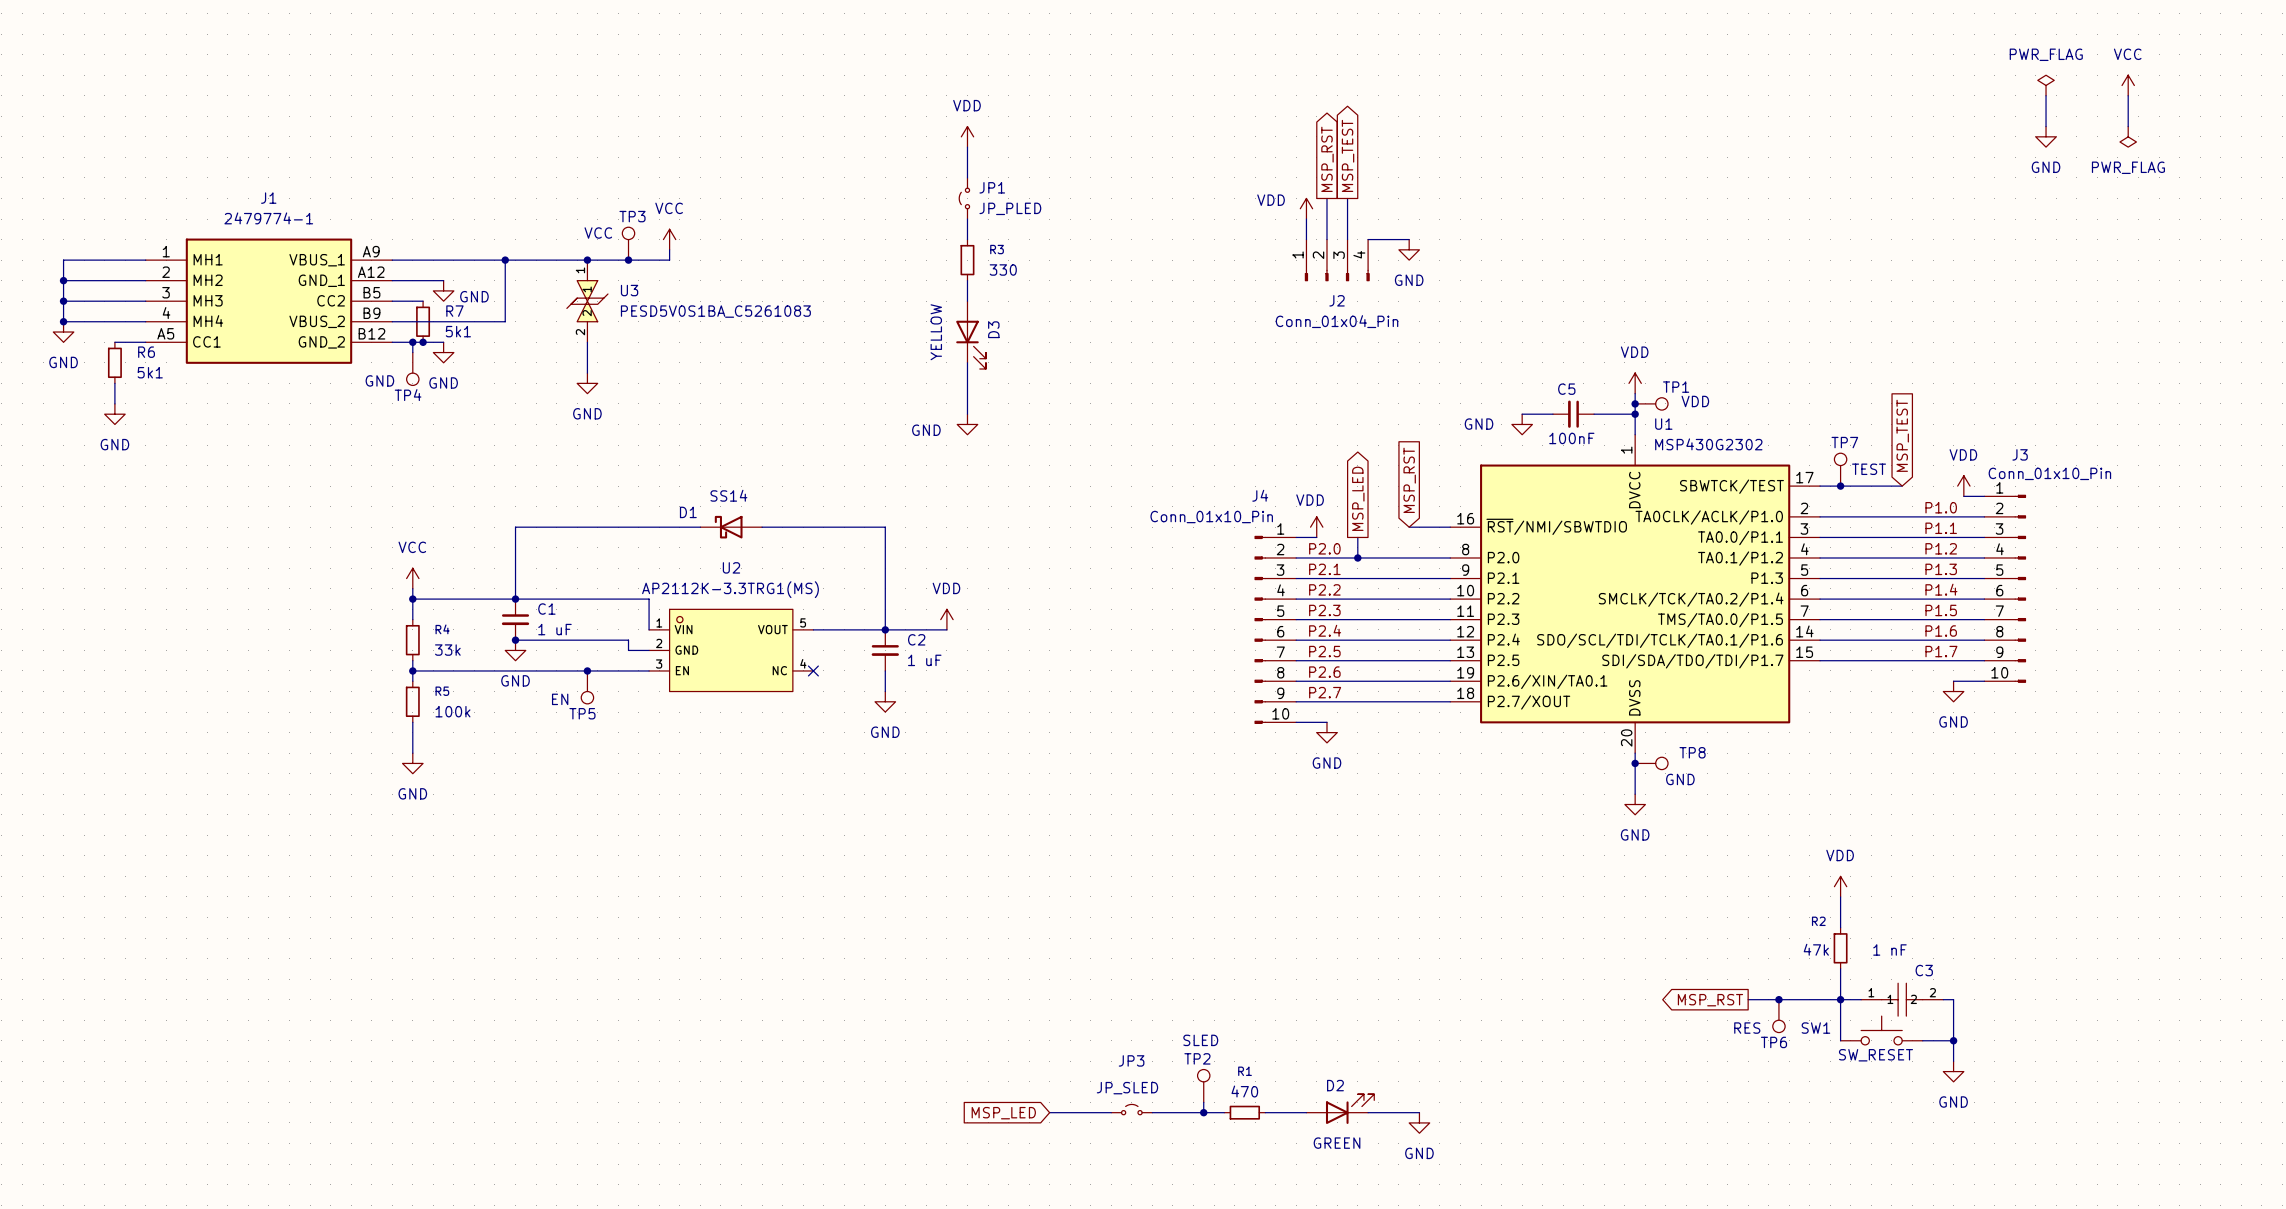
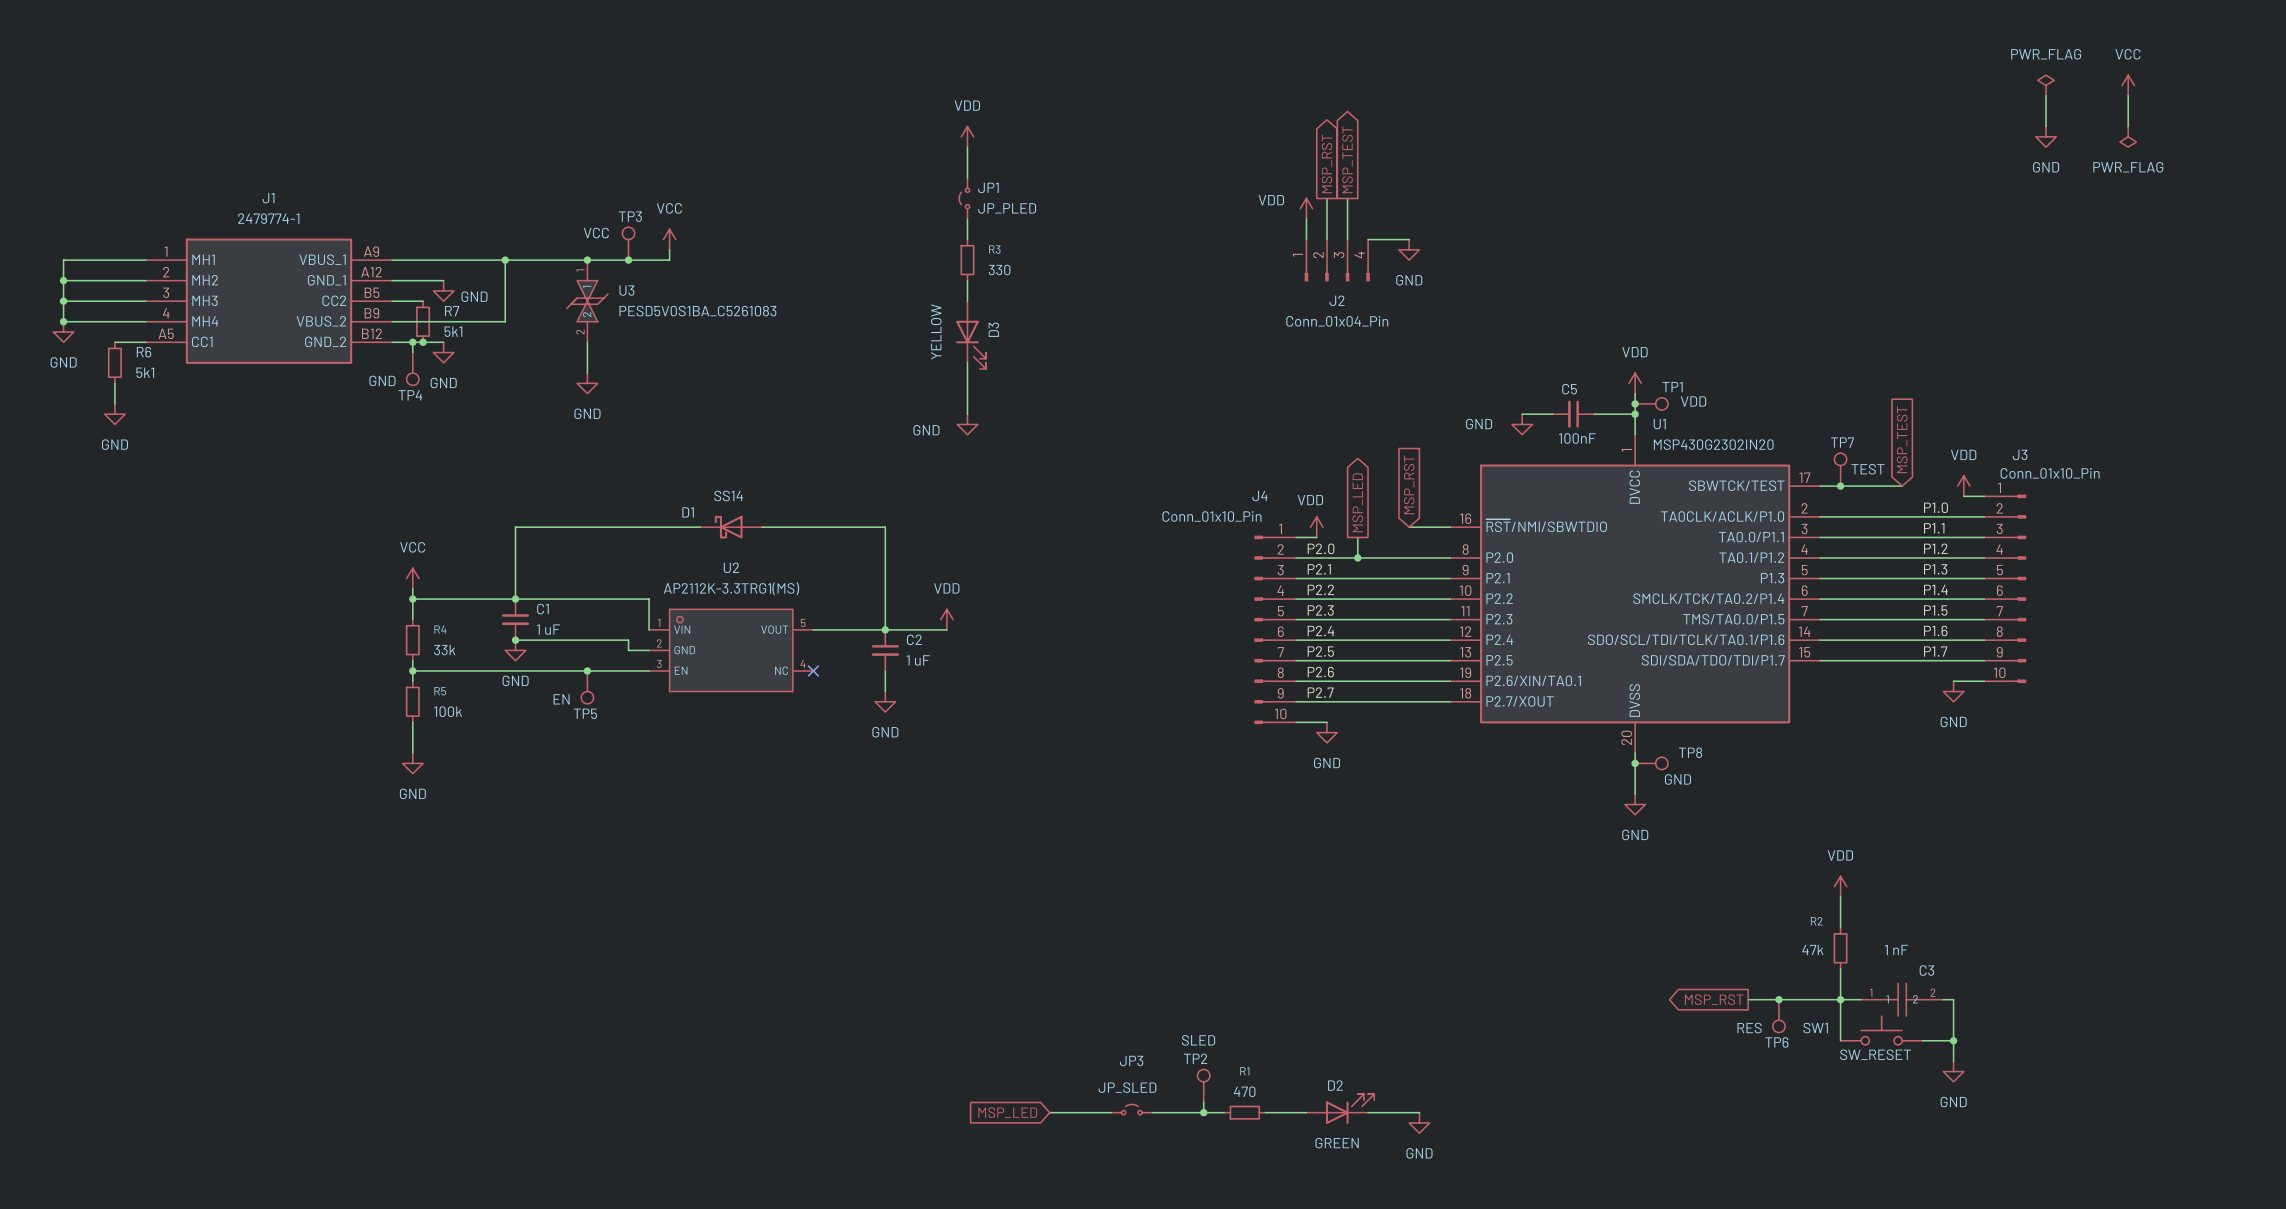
U1 value: MSP430G2302 (1708, 444) -> MSP430G2302IN20 (1713, 444)

